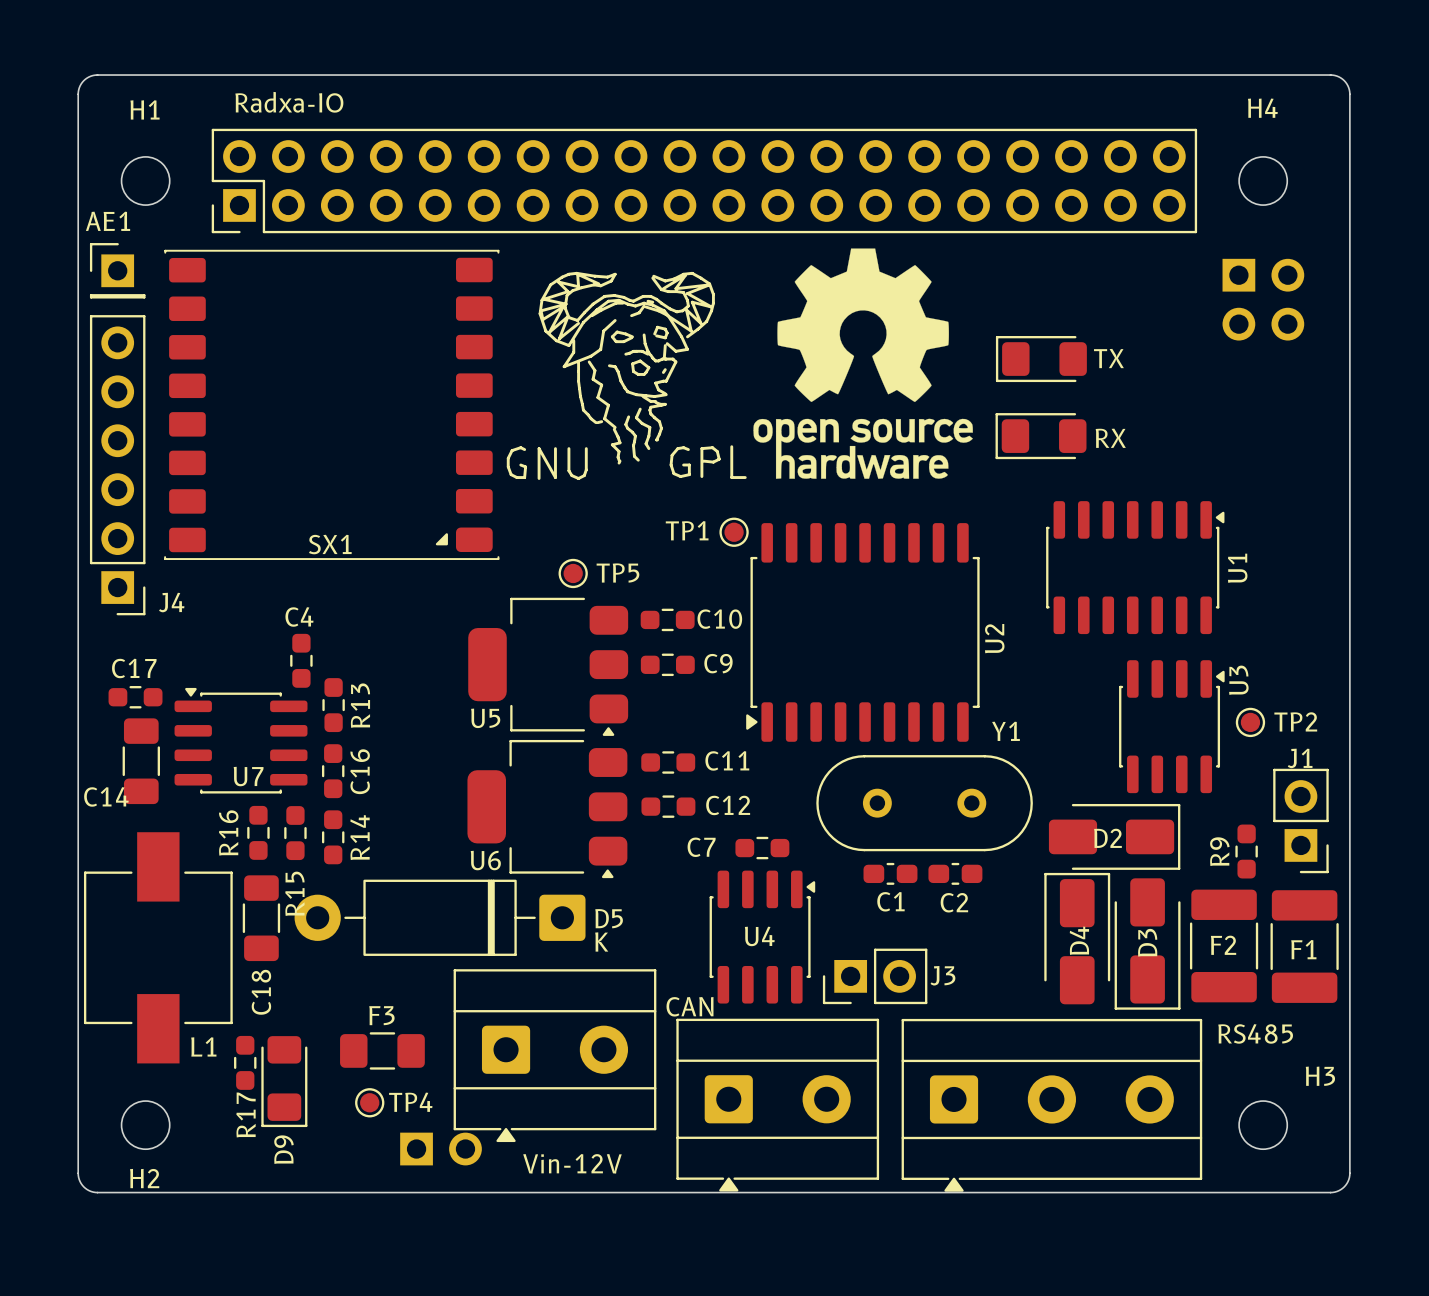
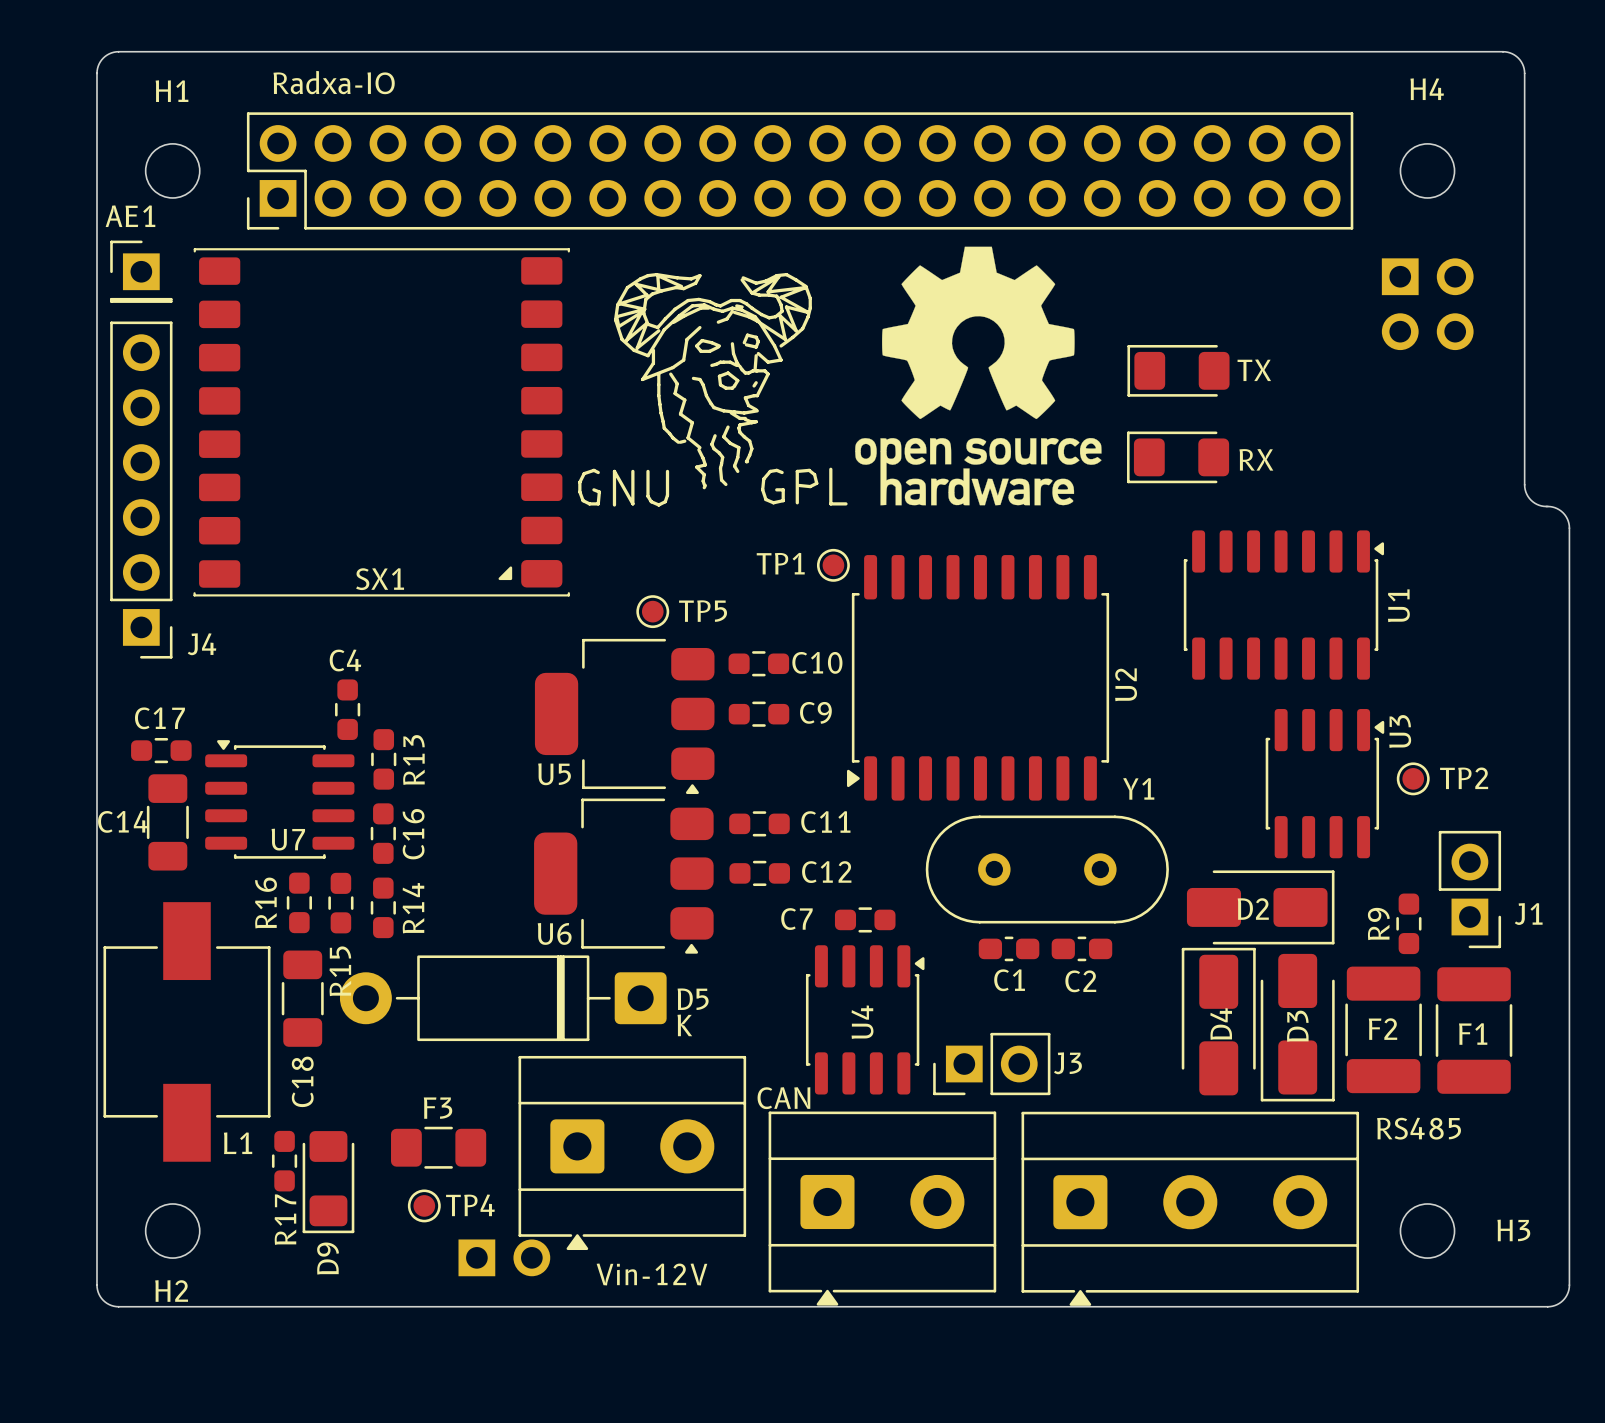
board edge: (78, 94) (83, 80) (97, 75) (1330, 75) (1342, 79) (1347, 85) (1349, 94) (1349, 1173) (1344, 1186) (1330, 1192) -> (96, 73) (99, 63) (103, 58) (111, 52) (118, 51) (1503, 51) (1516, 56) (1522, 63) (1524, 73) (1524, 487) (1527, 496) (1534, 503) (1554, 507) (1563, 512) (1567, 518) (1569, 528) (1569, 1285) (1566, 1296) (1554, 1305) (1503, 1306)
J1 name position: J1 (1300, 758) -> J1 (1528, 914)
C14 name position: C14 (106, 796) -> C14 (123, 821)
U4 name rotation: 0° (759, 936) -> 90° counterclockwise (862, 1022)
H3 name position: H3 (1320, 1076) -> H3 (1513, 1230)

